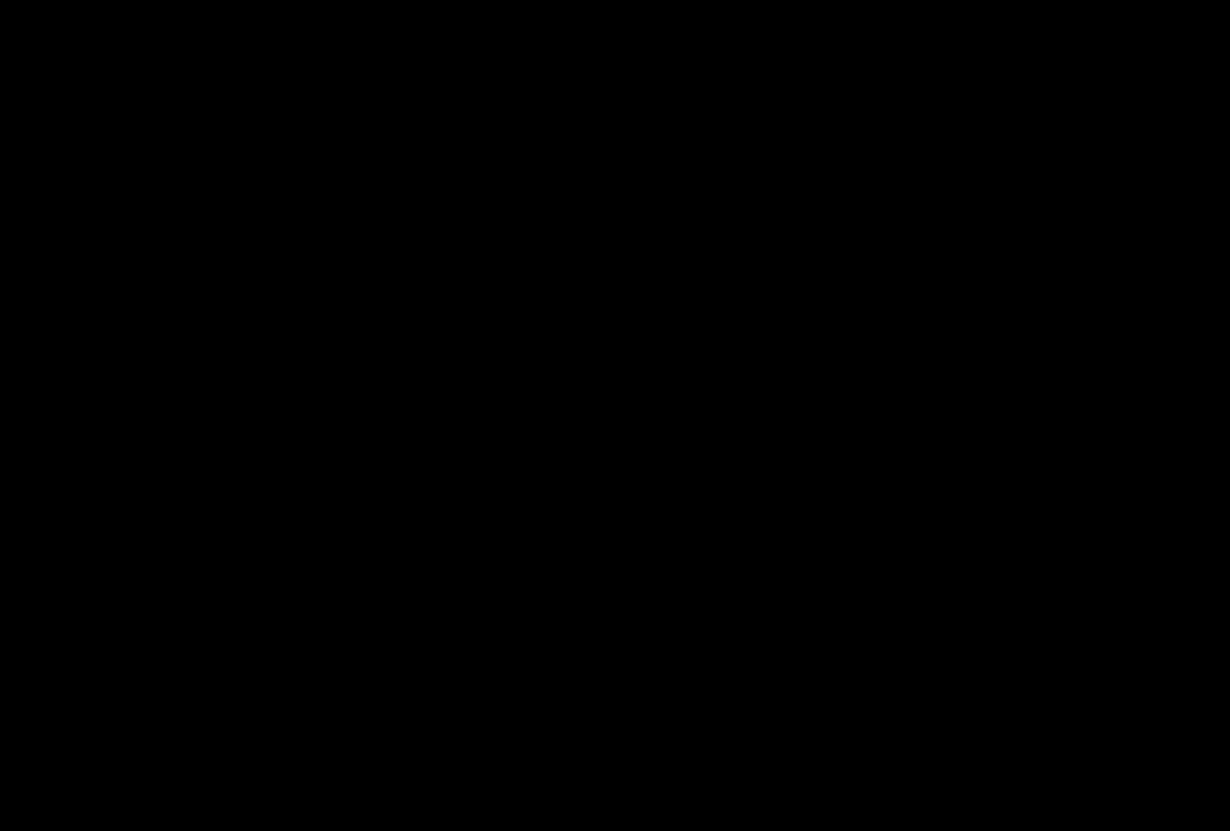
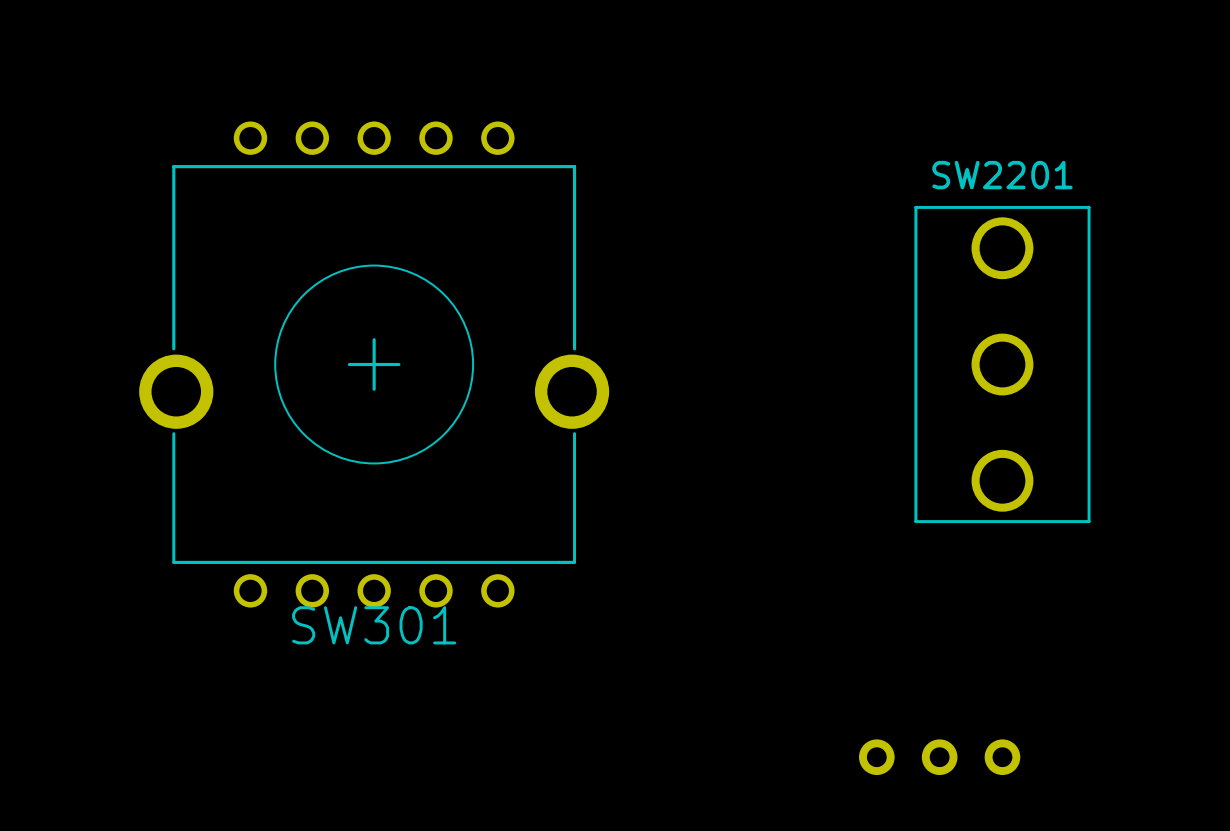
SW301: none -> (374, 364)
SW2201: none -> (1002, 364)
part: none -> (939, 757)

